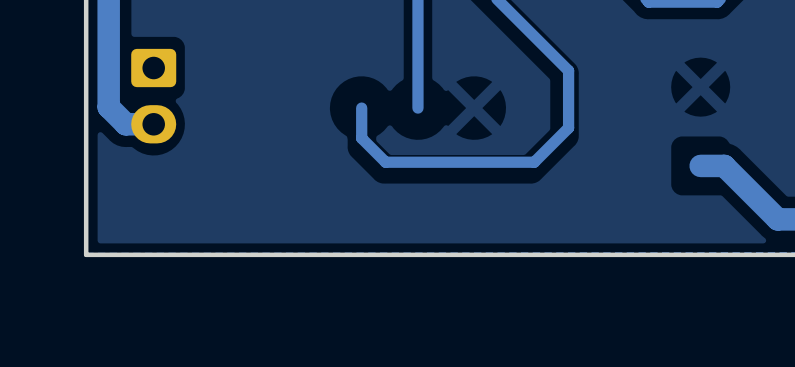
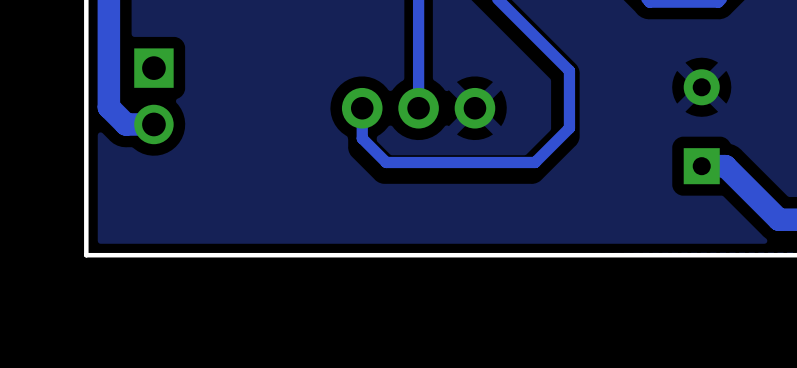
part footprint: [131, 48, 177, 144] -> [134, 48, 174, 145]
part: none -> (418, 108)
part: none -> (701, 126)

